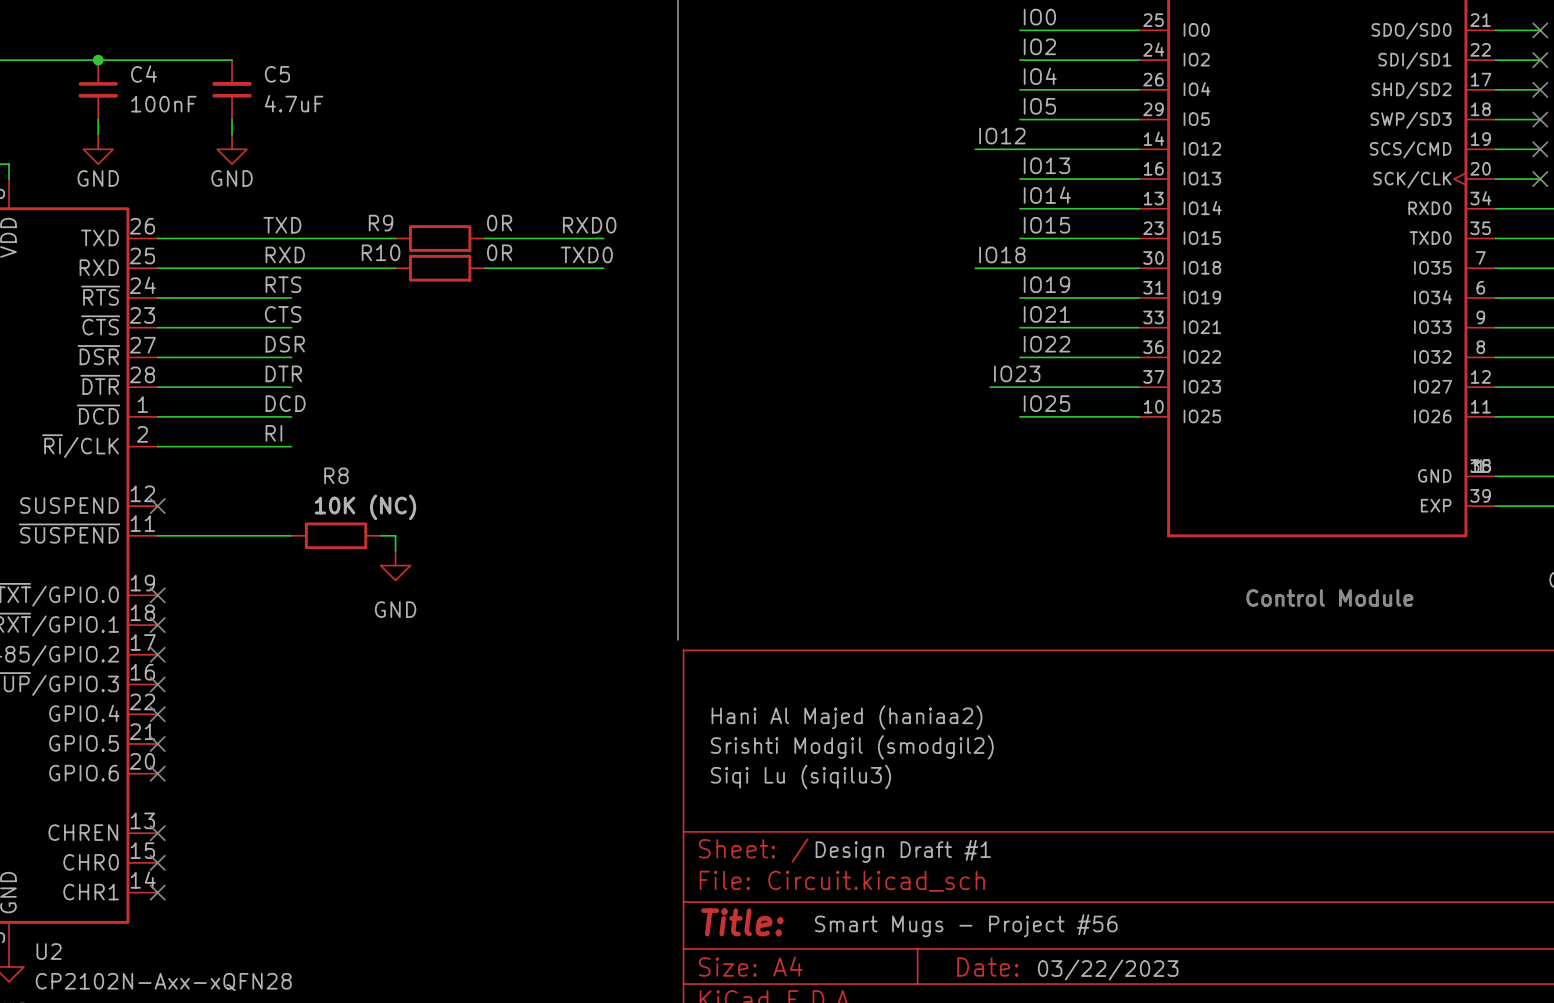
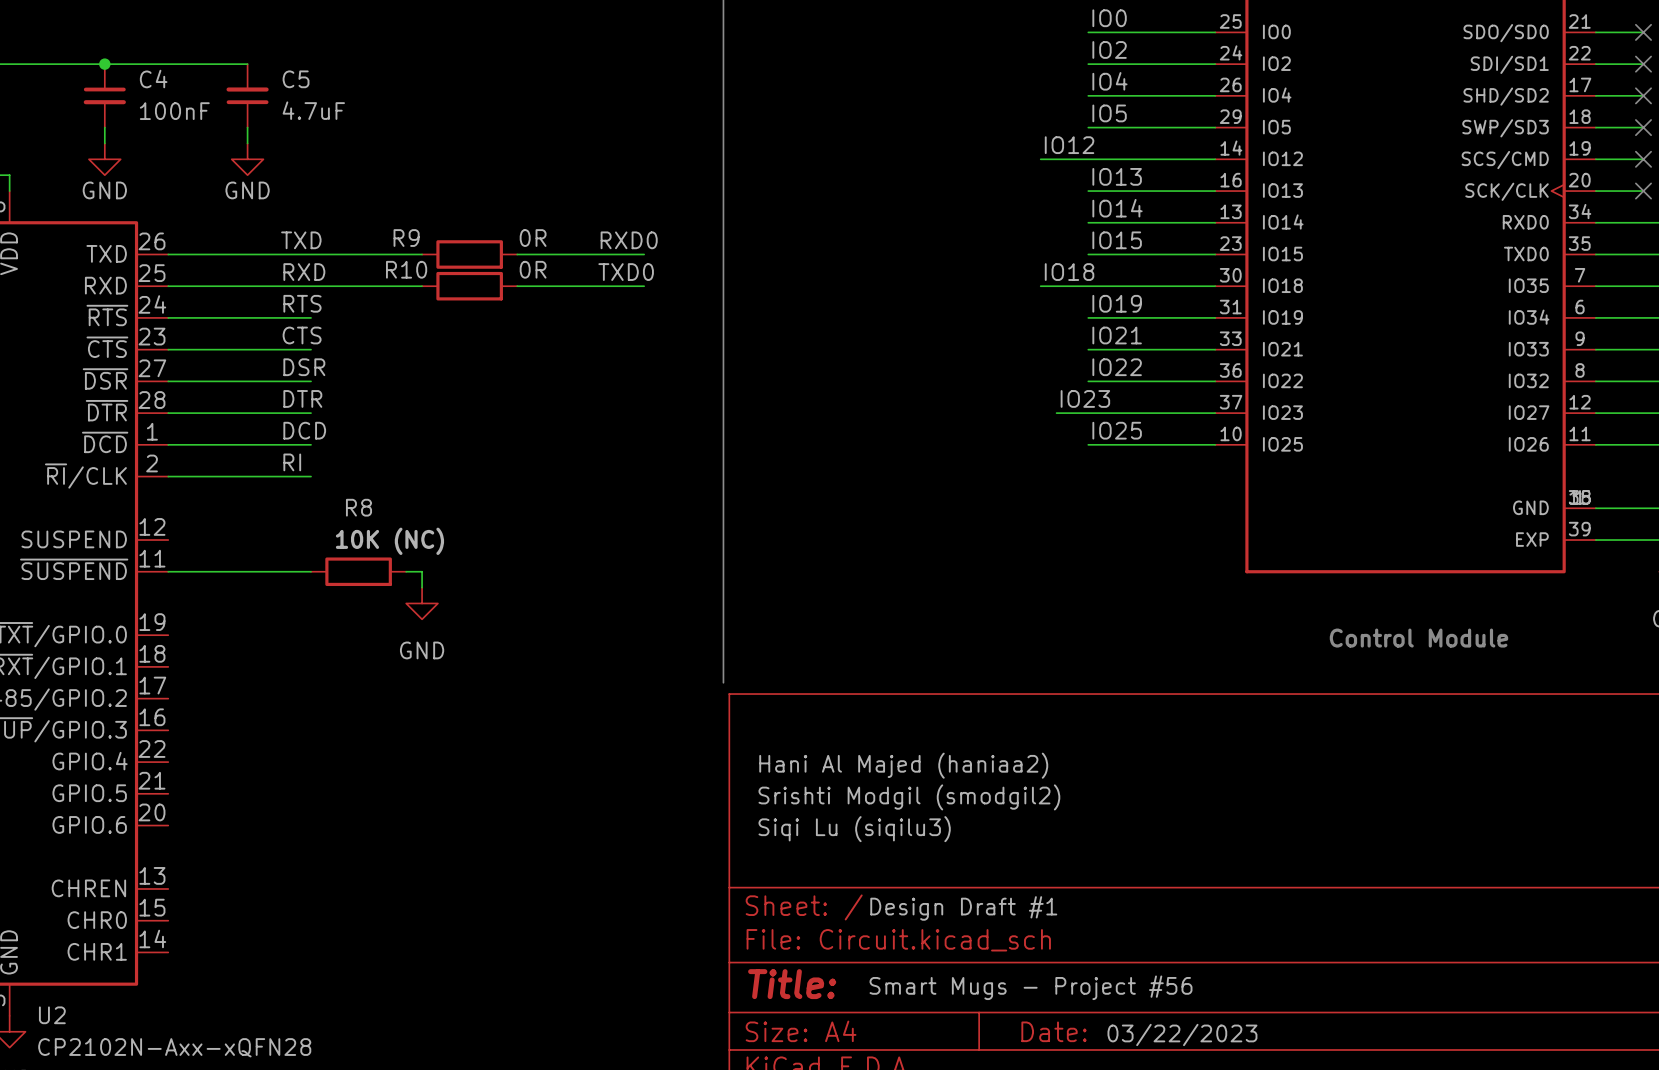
no-connect mark: (157, 506) -> none
no-connect mark: (157, 595) -> none
no-connect mark: (157, 625) -> none
no-connect mark: (157, 654) -> none
no-connect mark: (157, 684) -> none
no-connect mark: (157, 714) -> none
no-connect mark: (157, 743) -> none
no-connect mark: (157, 773) -> none
no-connect mark: (157, 833) -> none
no-connect mark: (157, 862) -> none
no-connect mark: (157, 892) -> none

